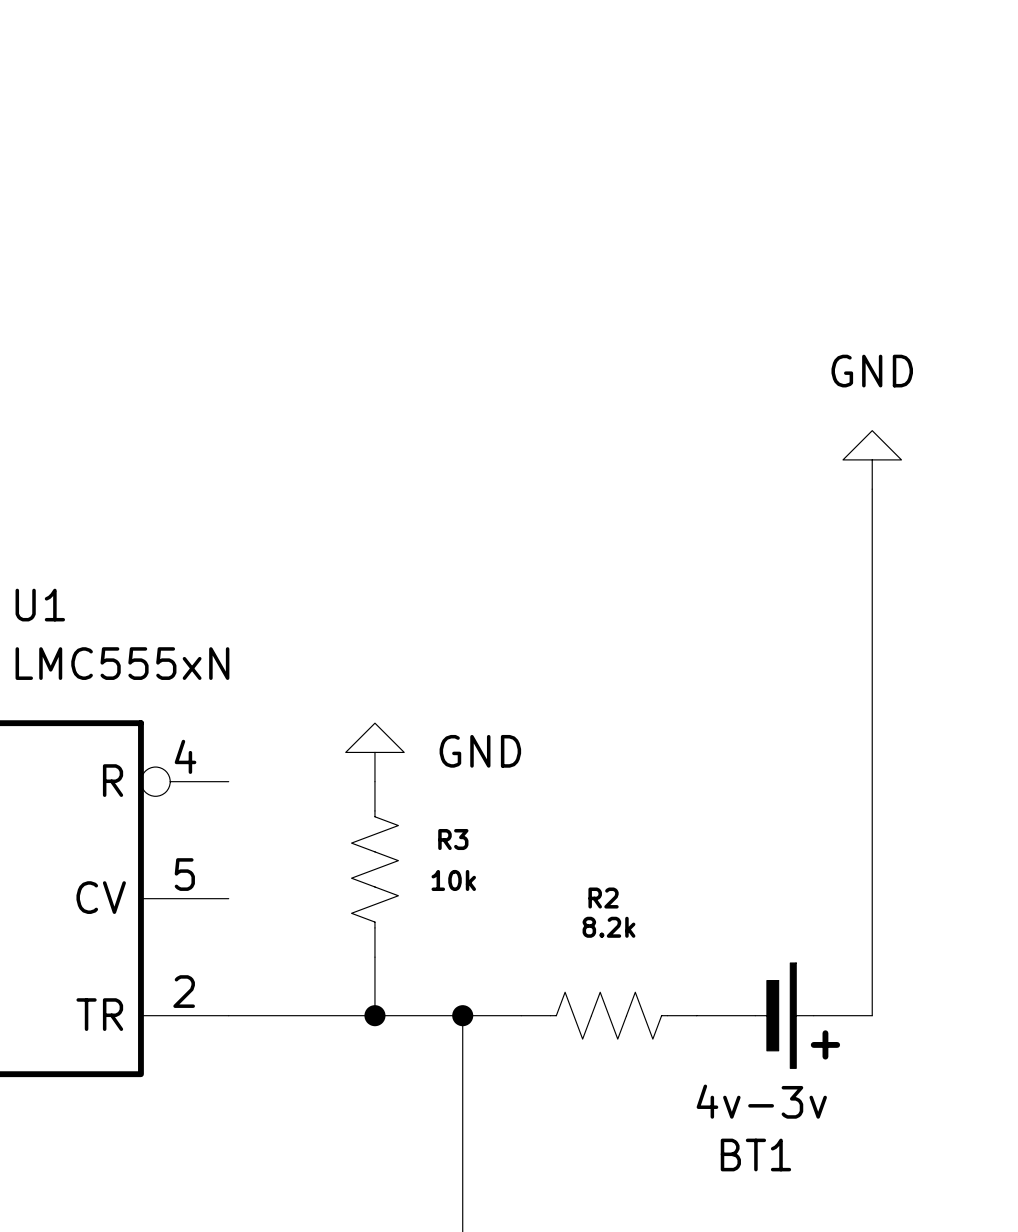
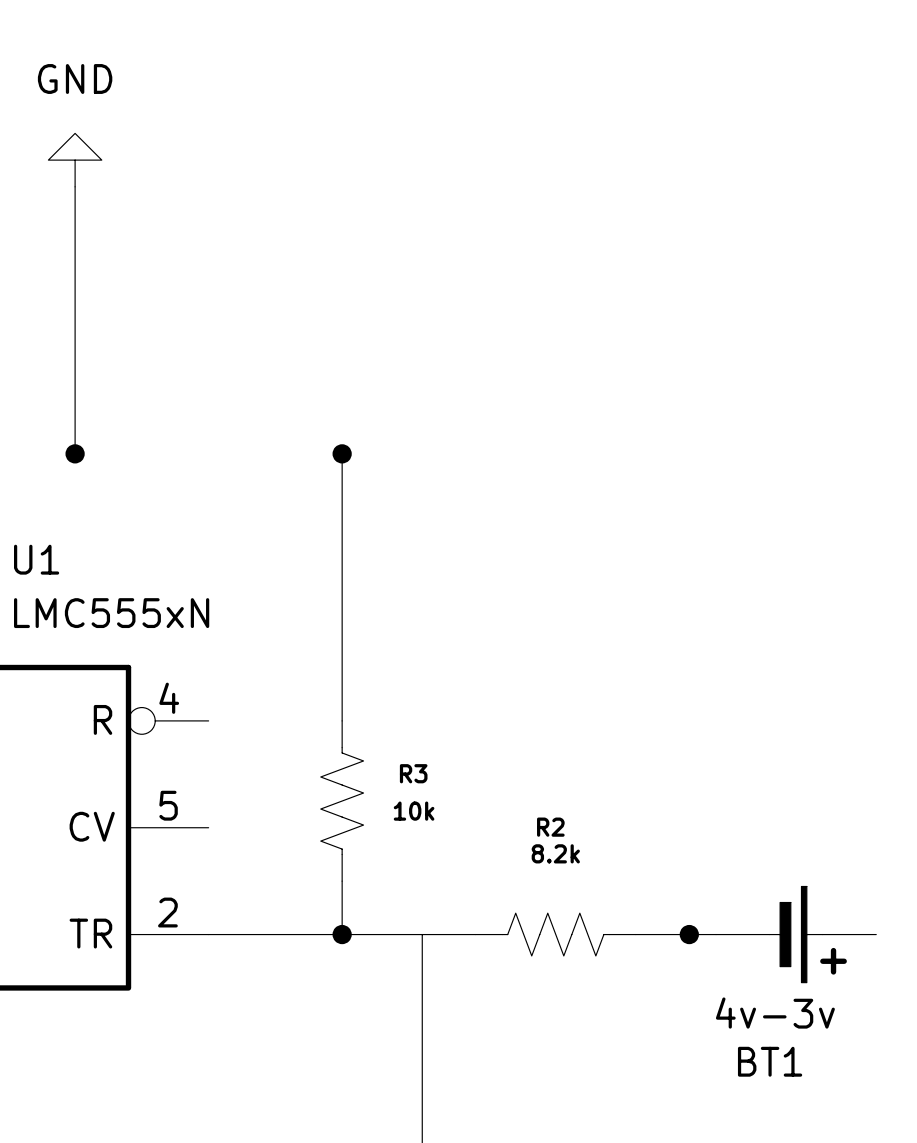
power symbol: none -> GND (75, 160)
wire: none -> (75, 186) (75, 453)
power symbol: GND (872, 459) -> none
junction: none -> (75, 453)
wire: none -> (342, 453) (342, 720)
junction: none -> (342, 453)
wire: (872, 489) (872, 1015) -> none
power symbol: GND (374, 752) -> none
junction: (462, 1015) -> none
junction: none -> (689, 934)
BT1 position: (784, 1015) -> (796, 934)

